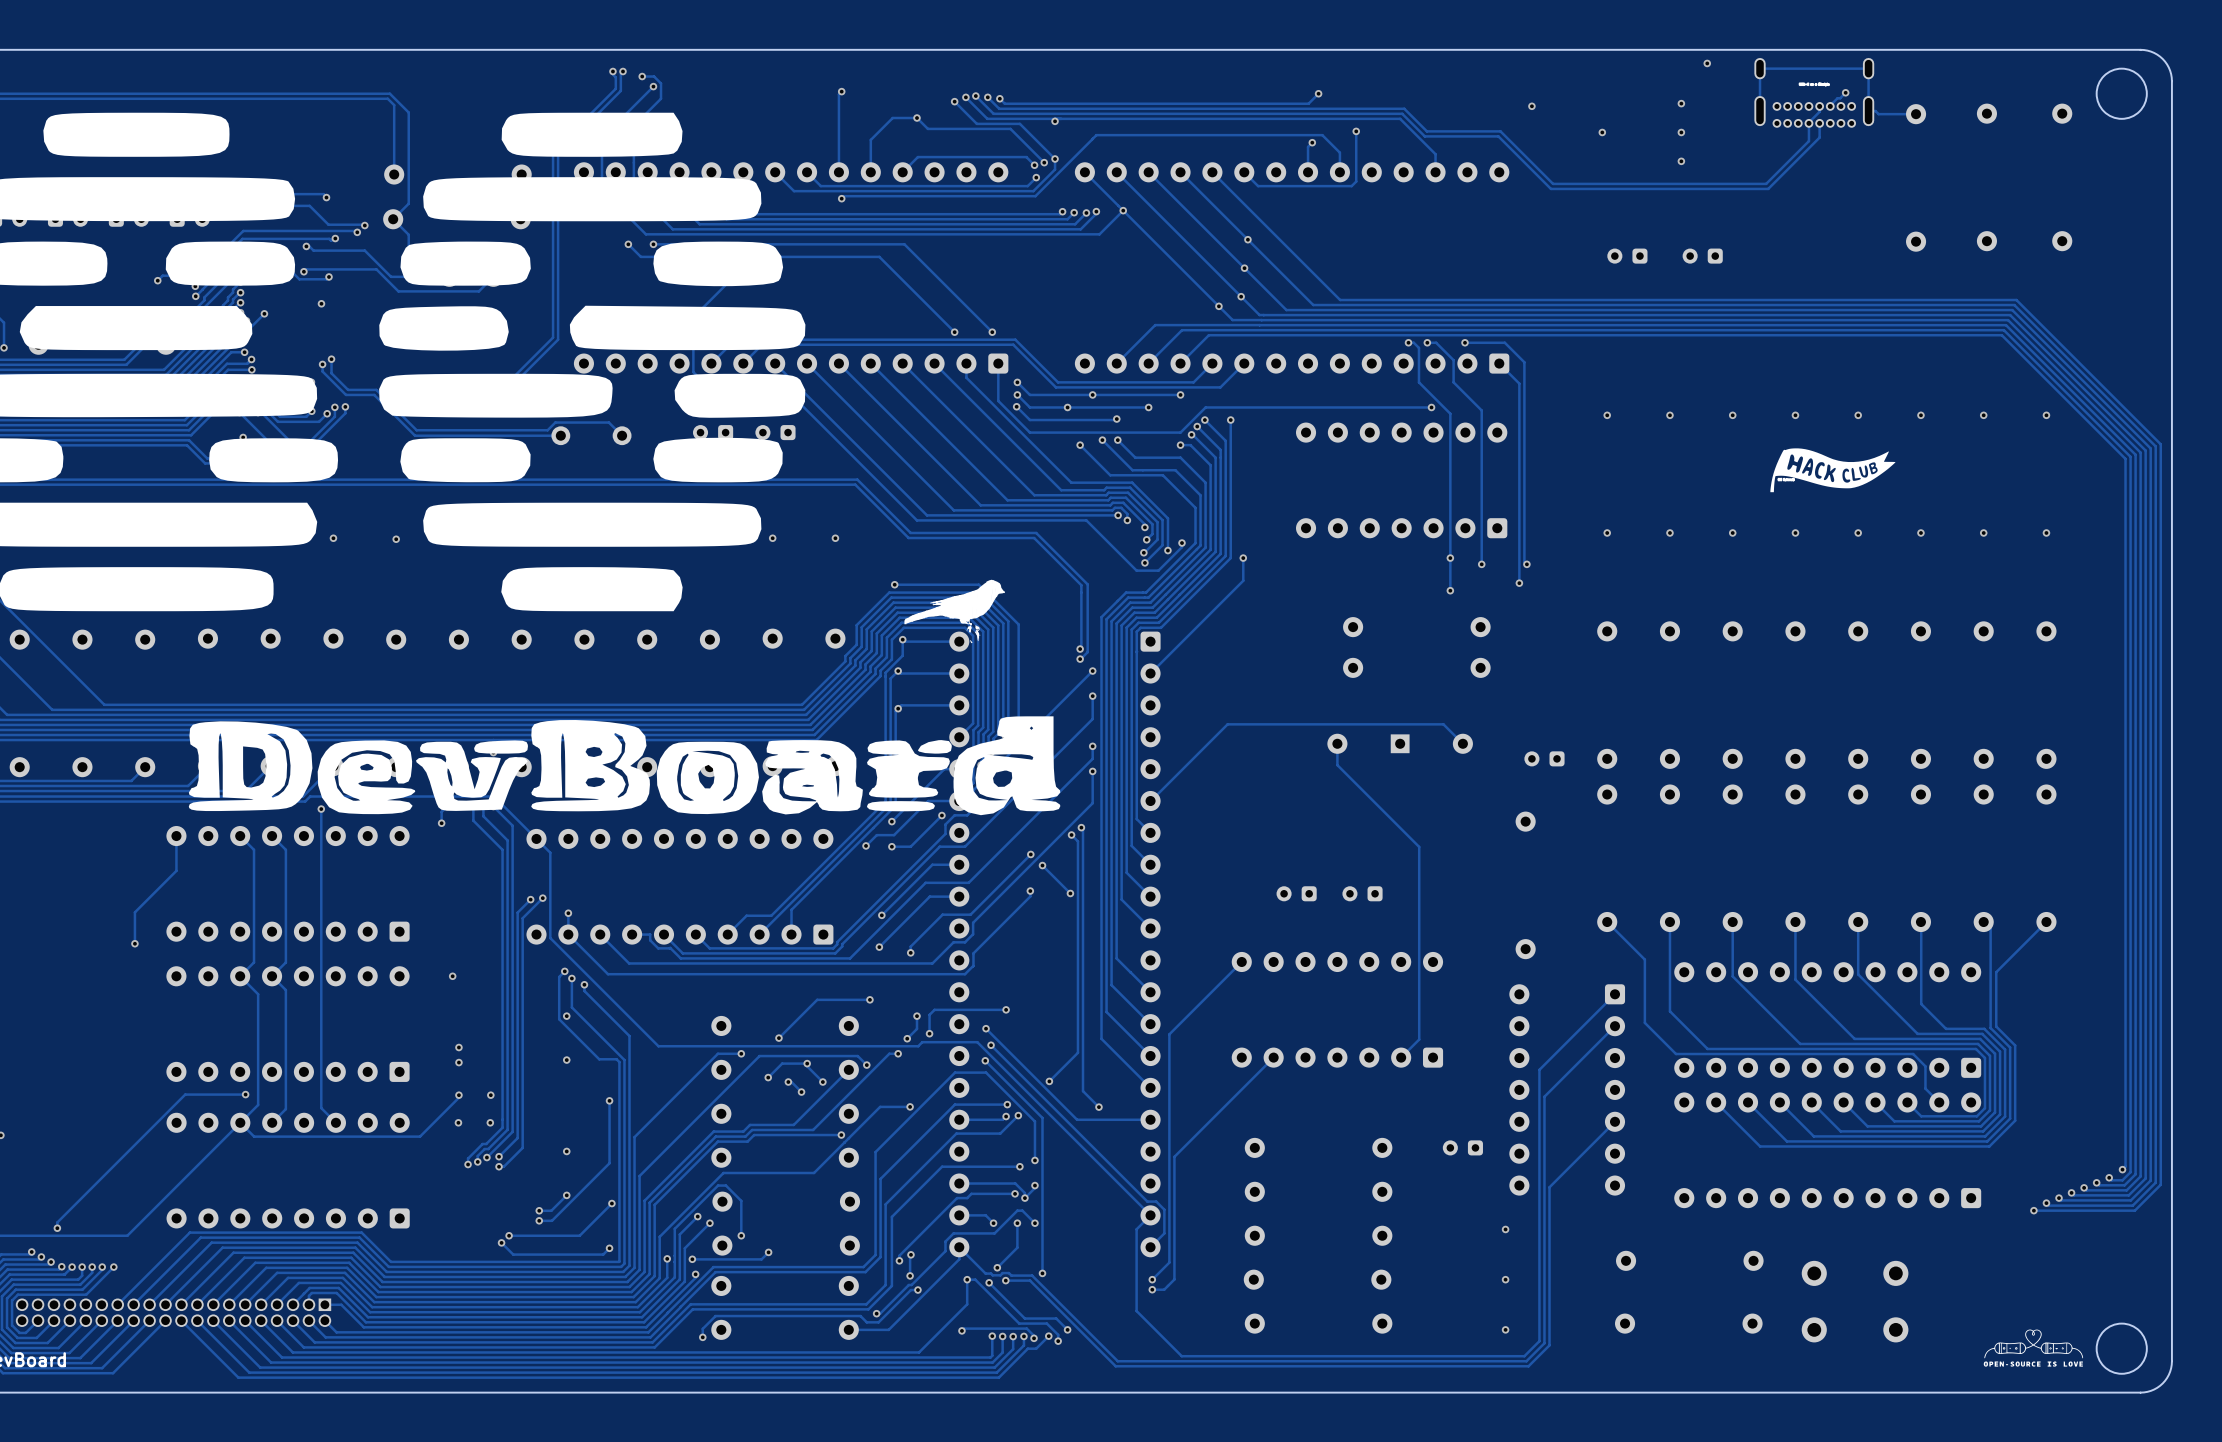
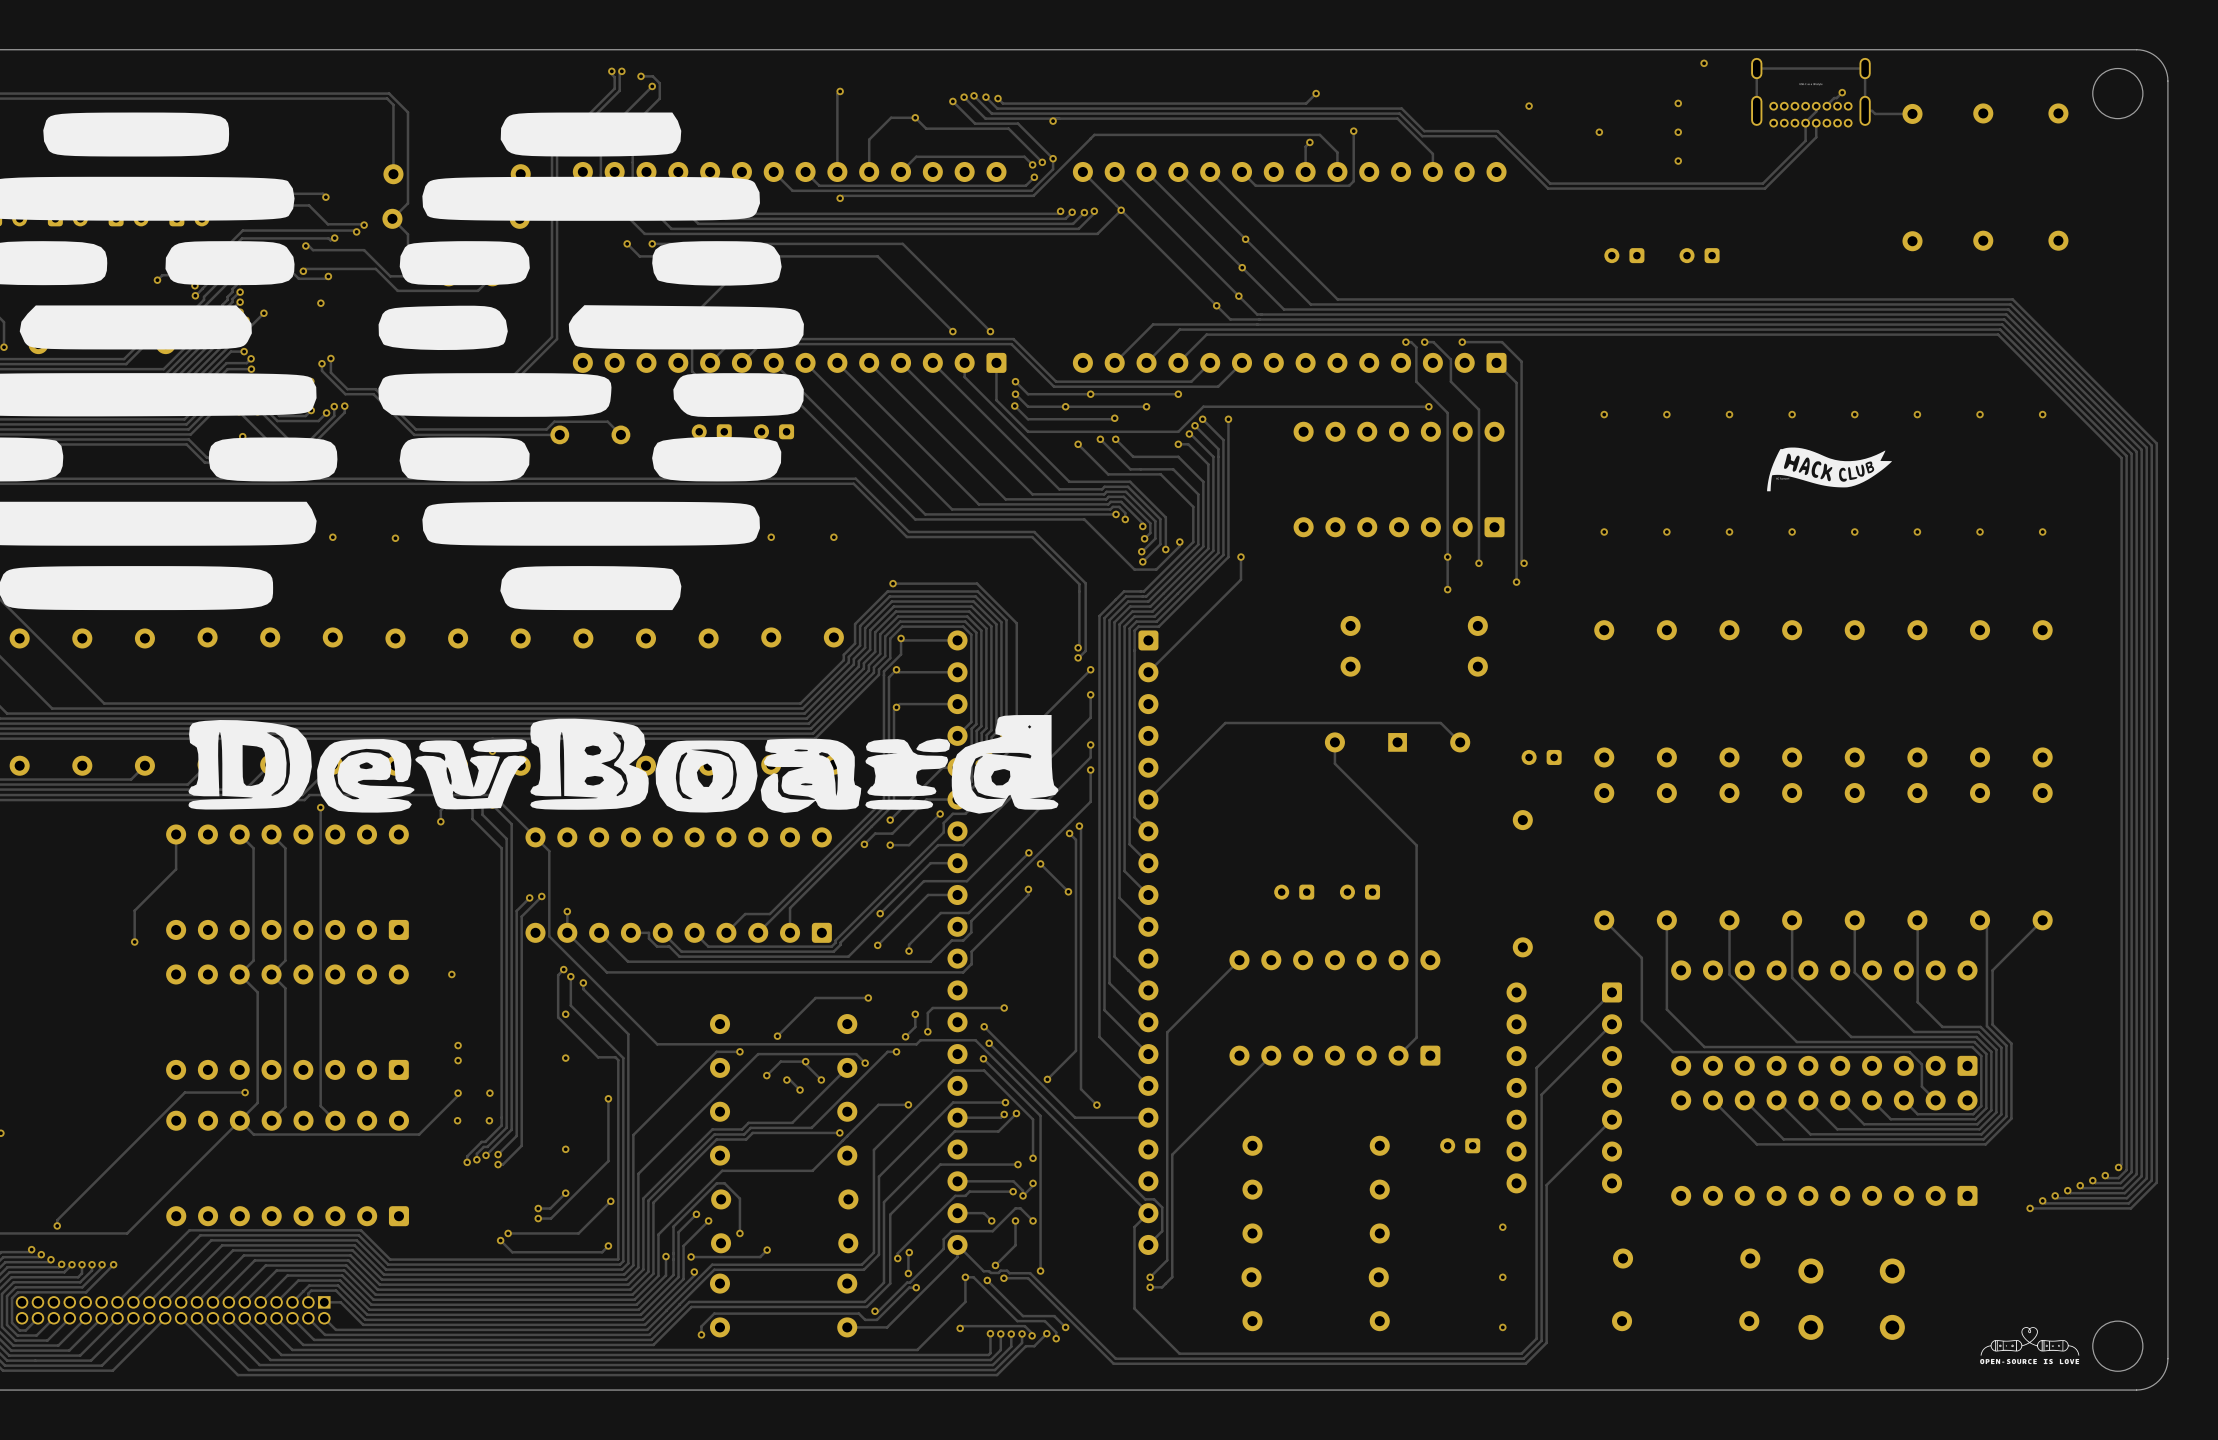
drawing: [904, 579, 1005, 644] -> none

